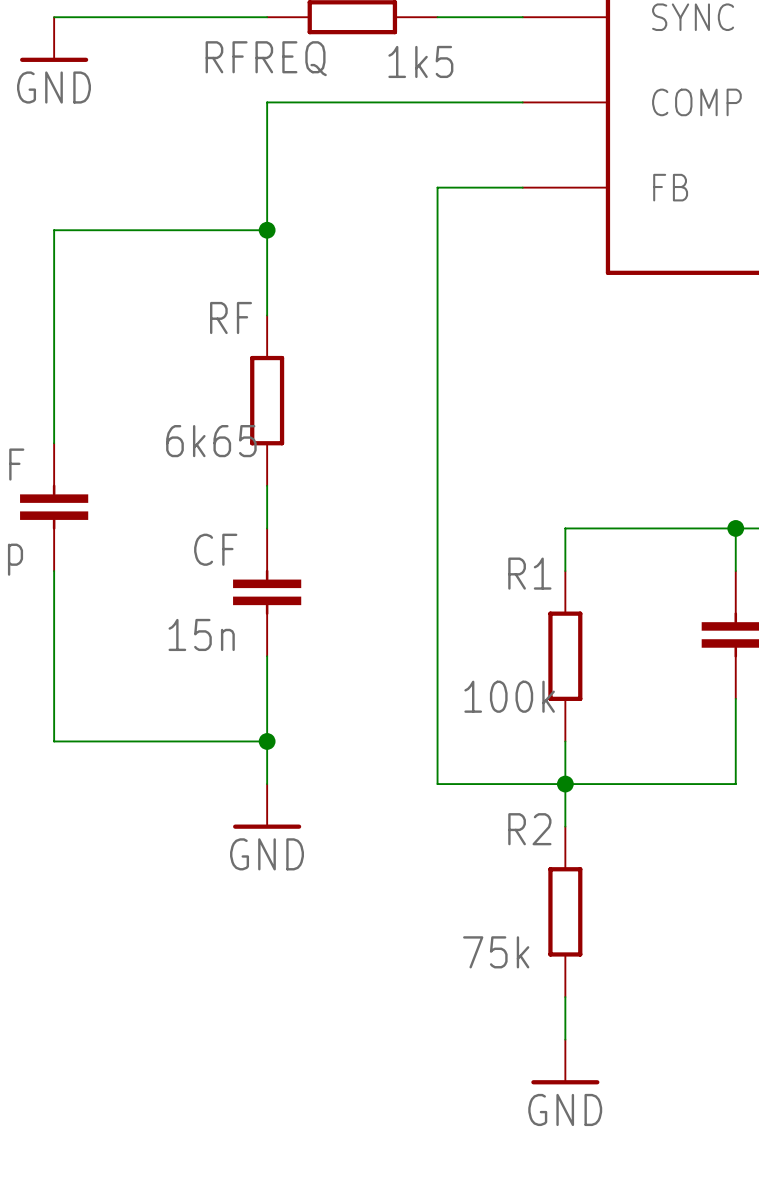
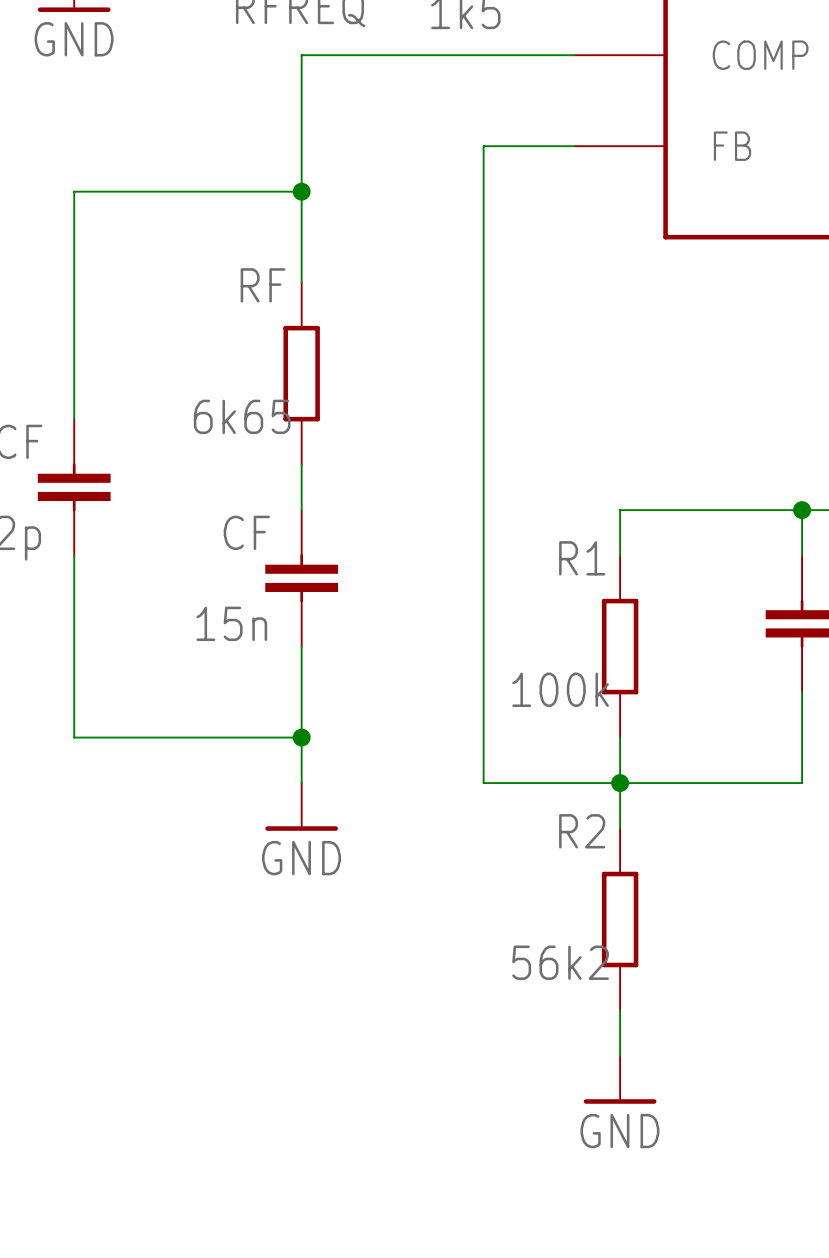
R2 value: 75k (496, 952) -> 56k2 (560, 962)

